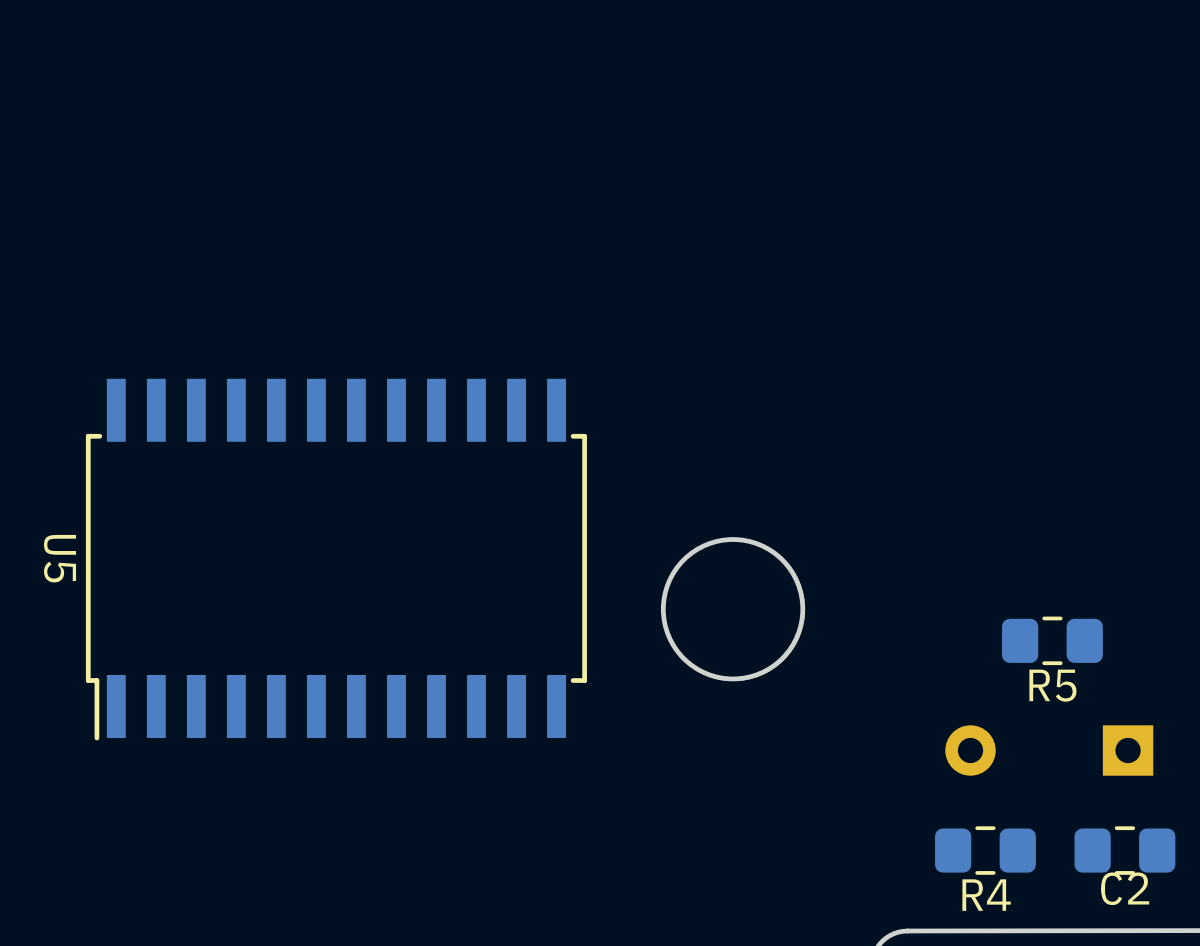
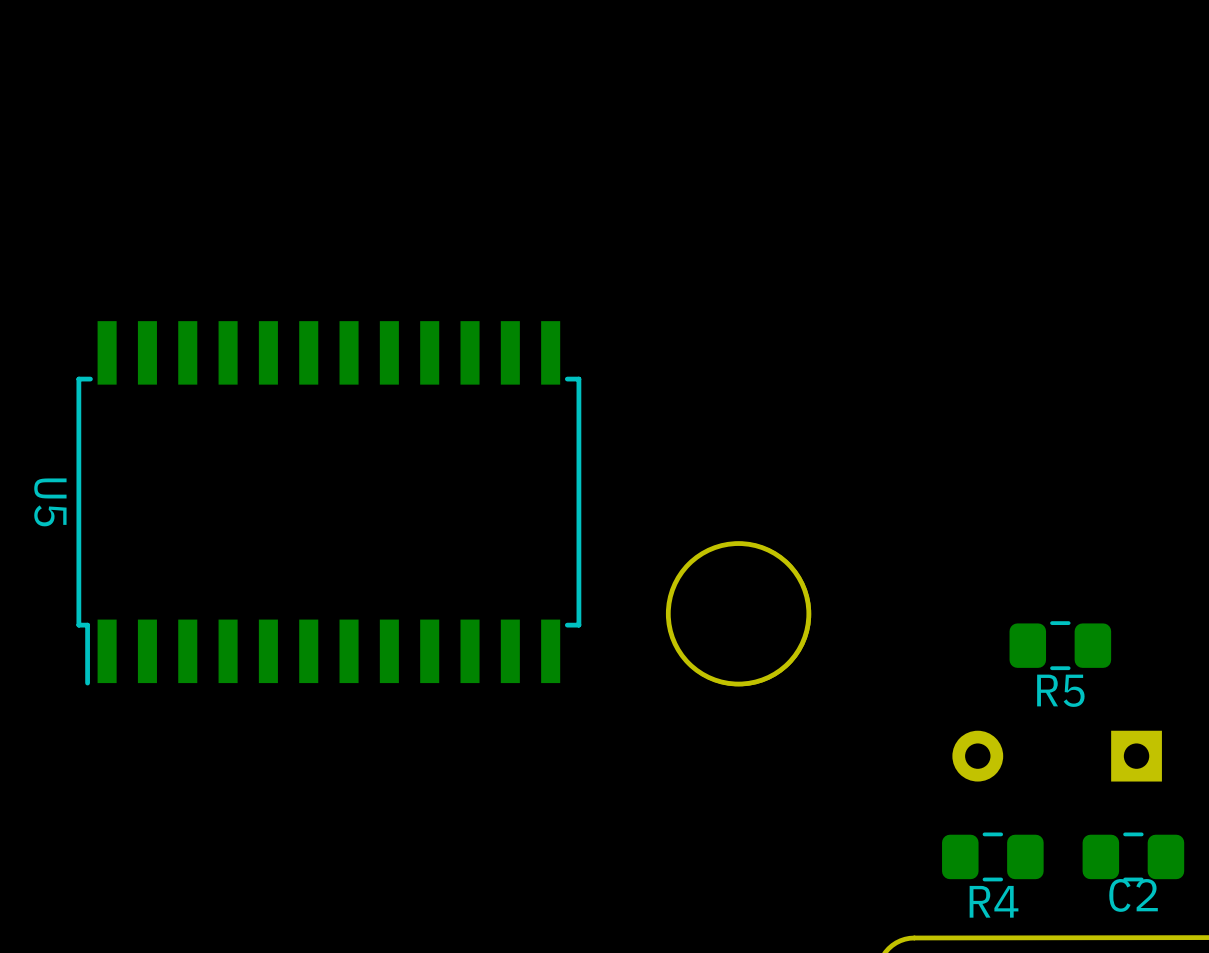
U5 position: (336, 559) -> (328, 503)

